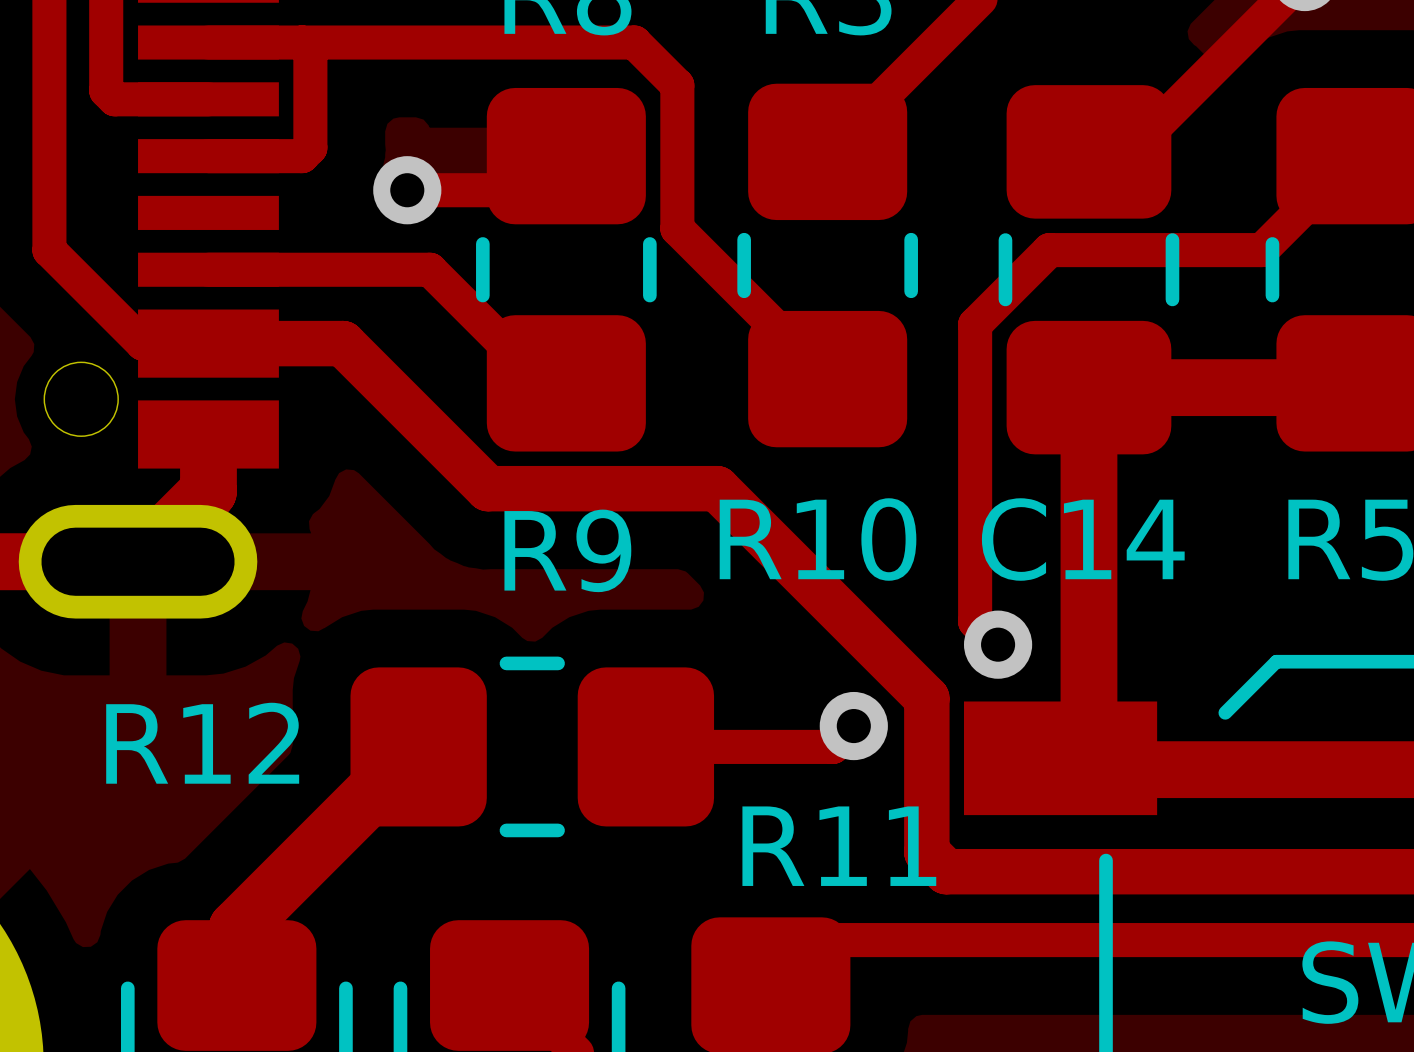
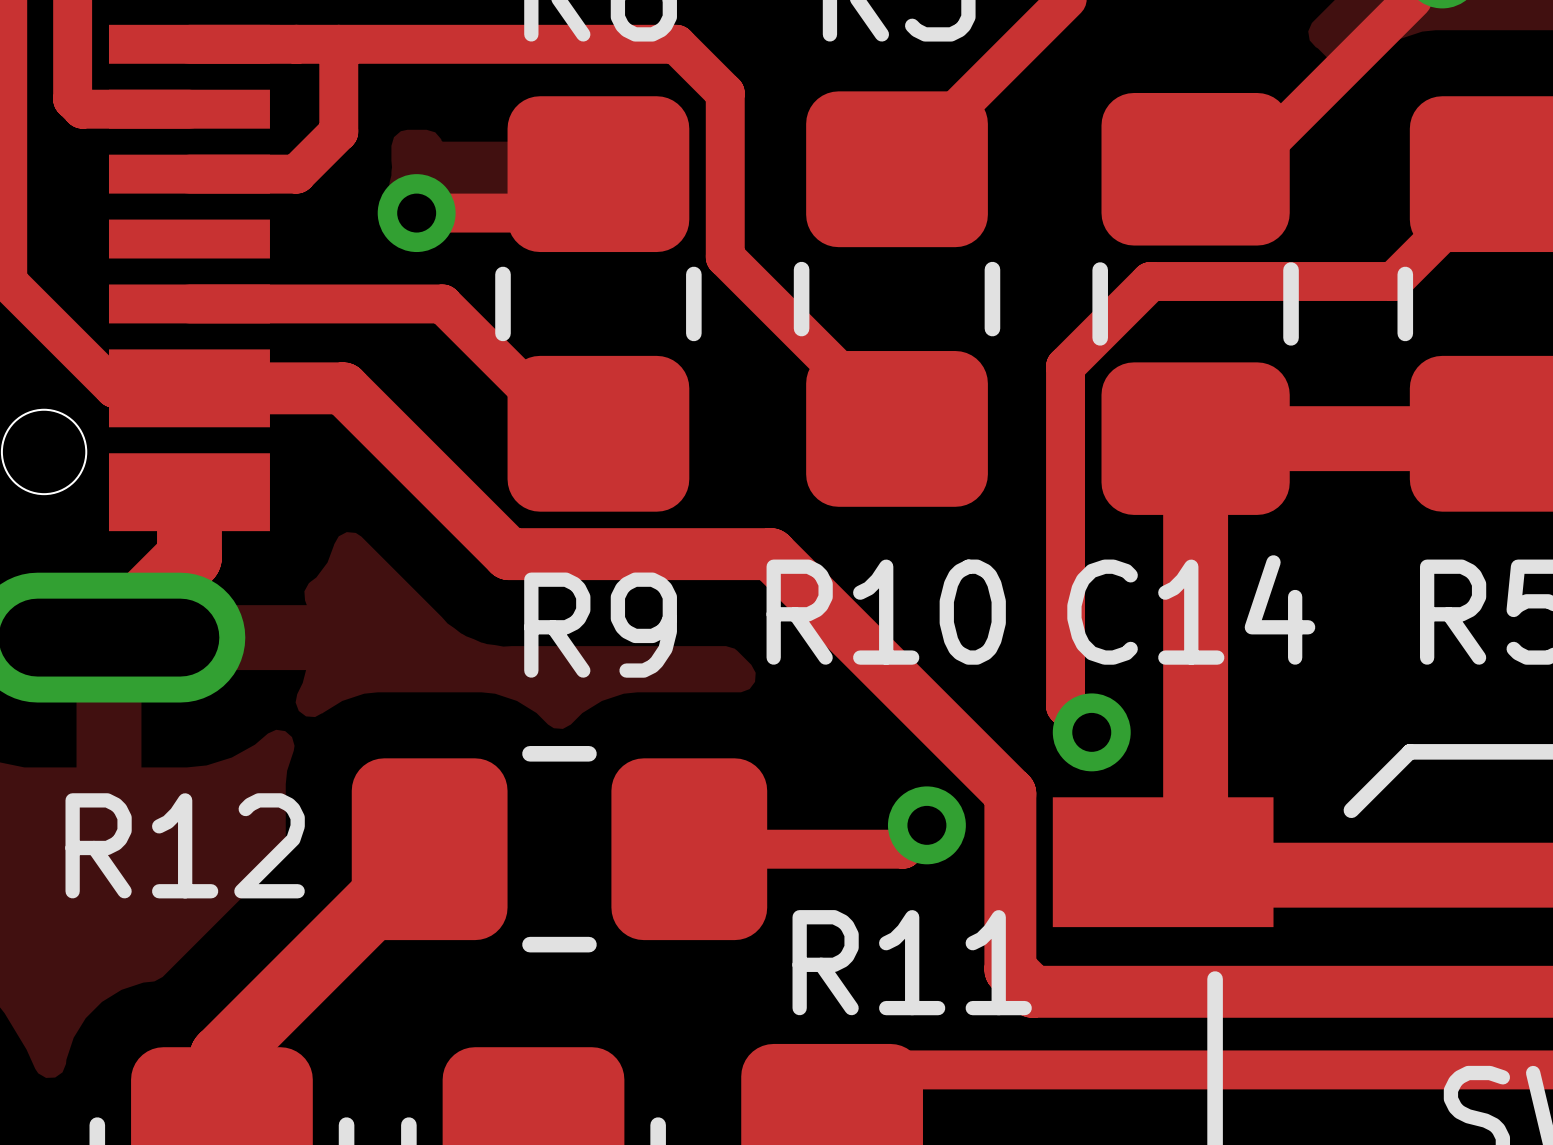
track: (302, 42) (310, 50) (310, 147) -> (338, 44) (338, 131) (305, 164)

